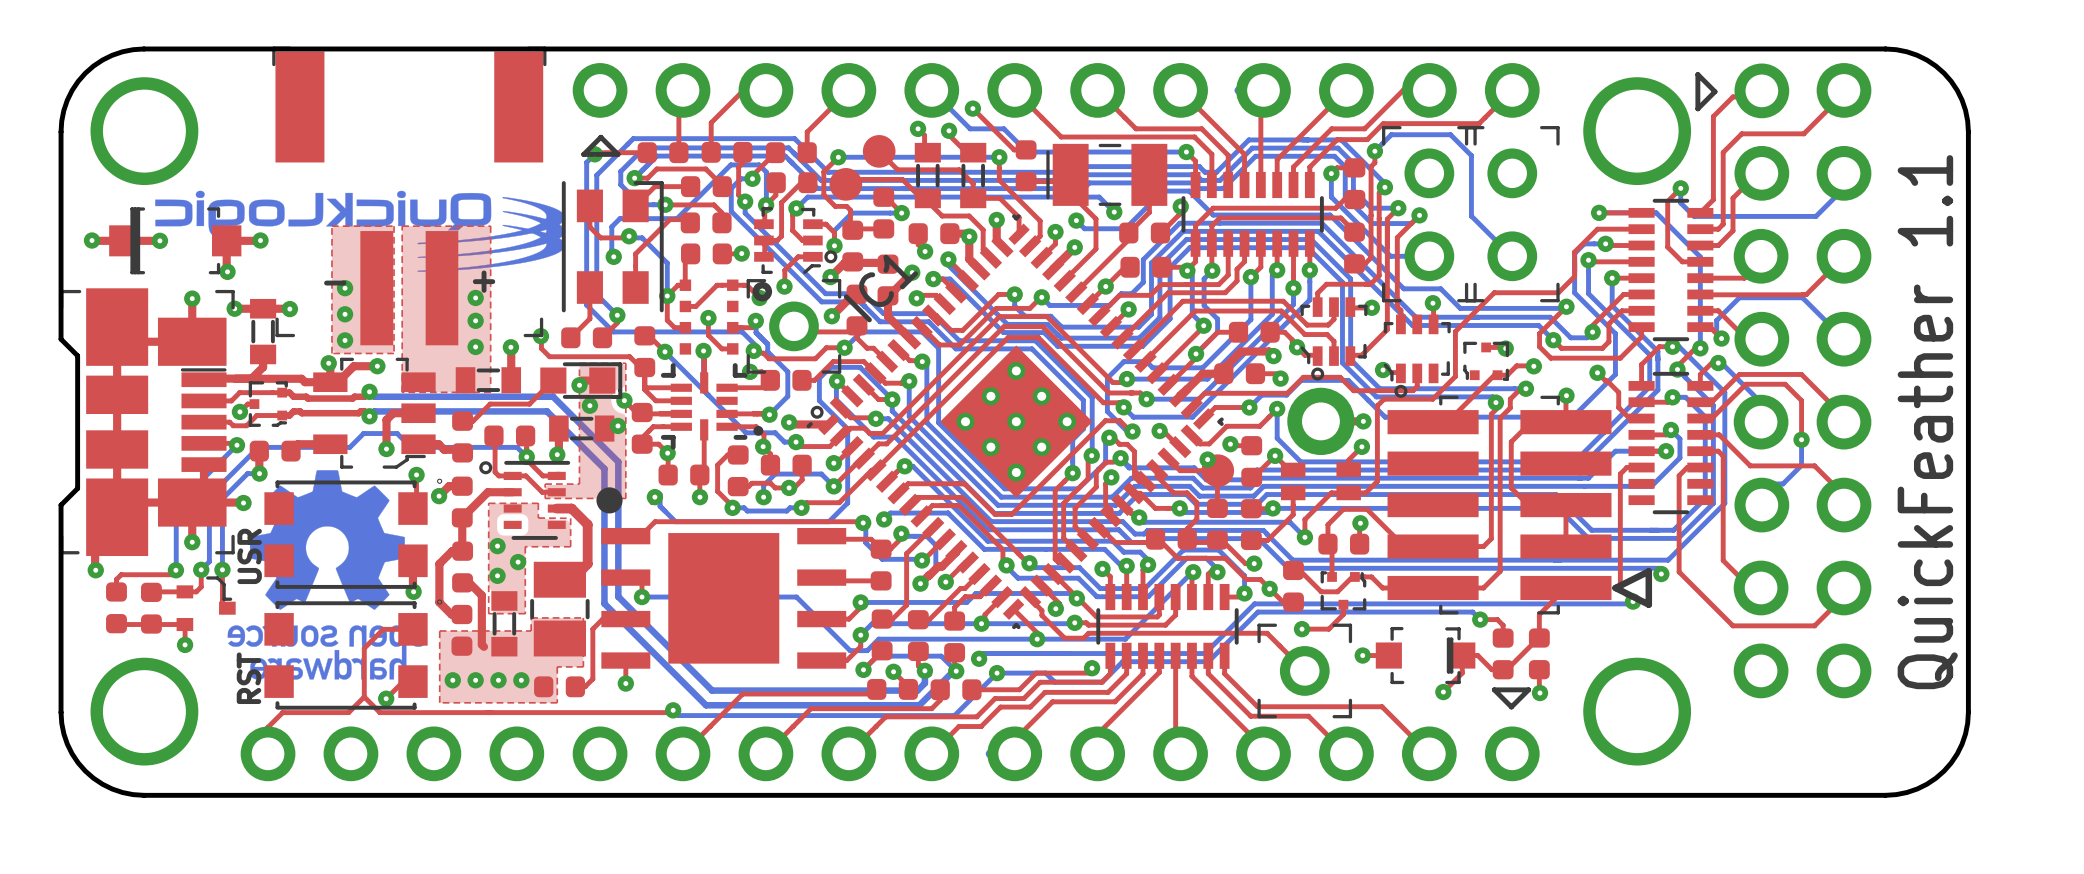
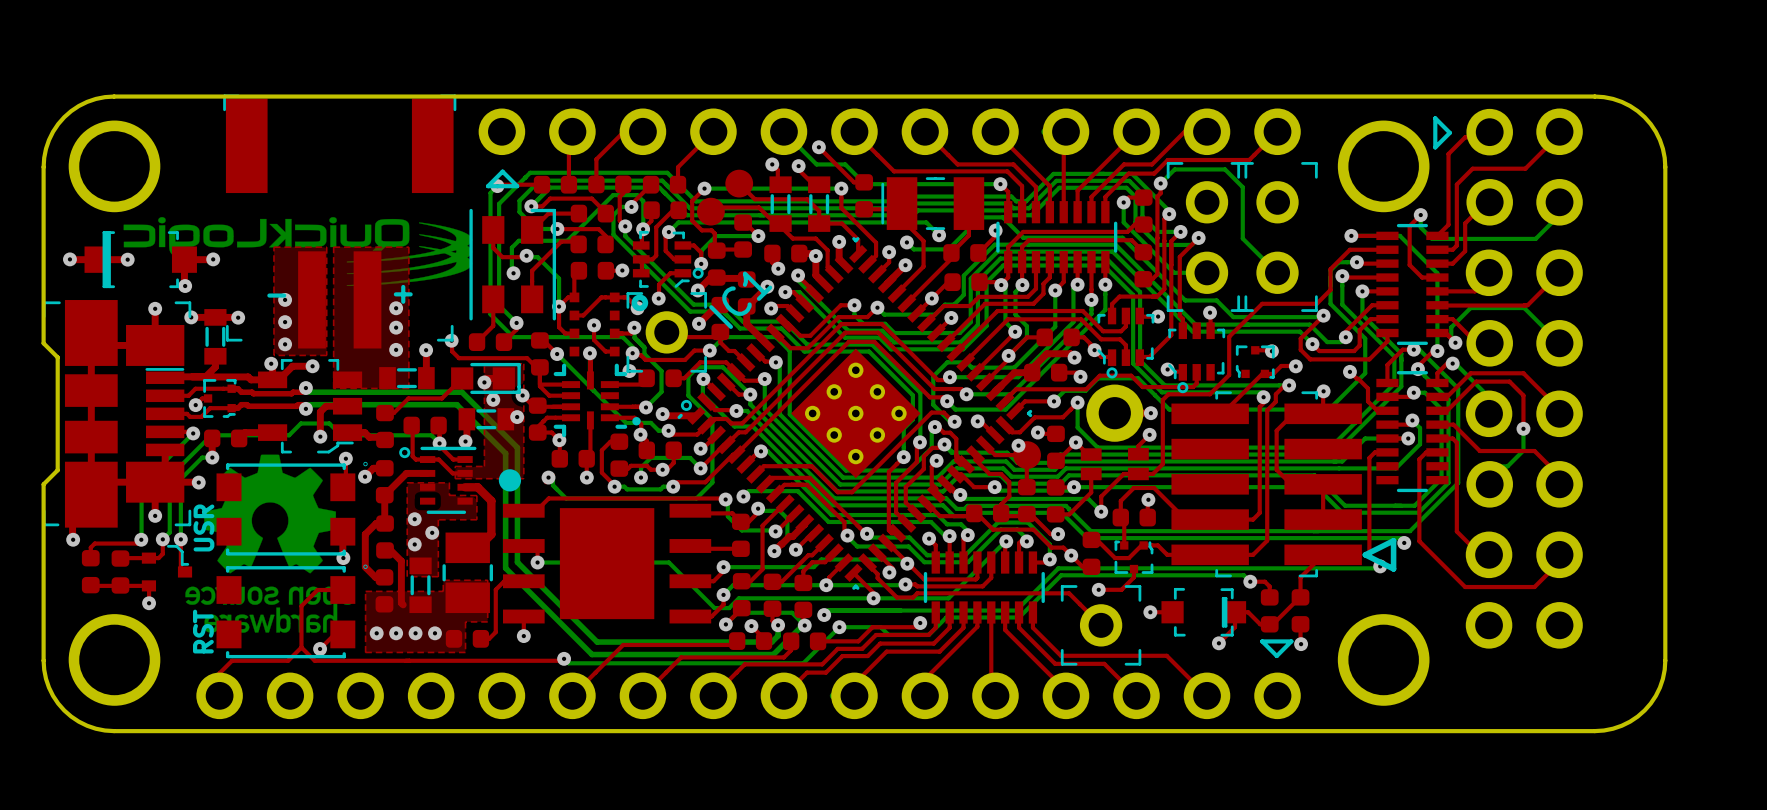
text: QuickFeather 1.1 (1927, 422) -> none

